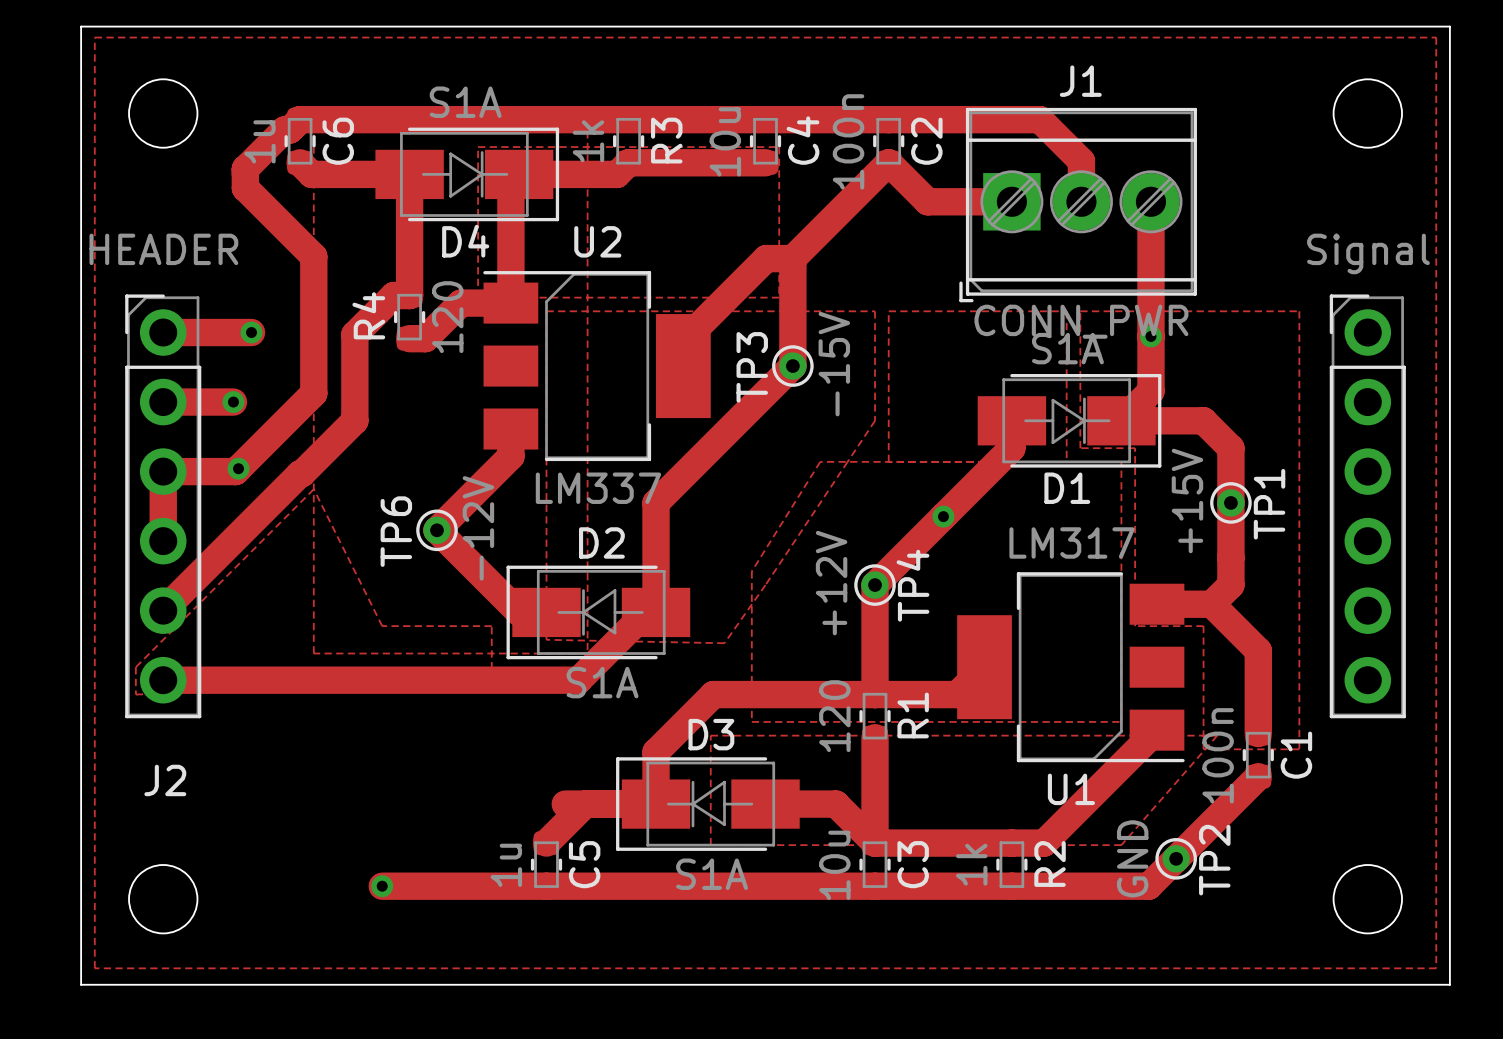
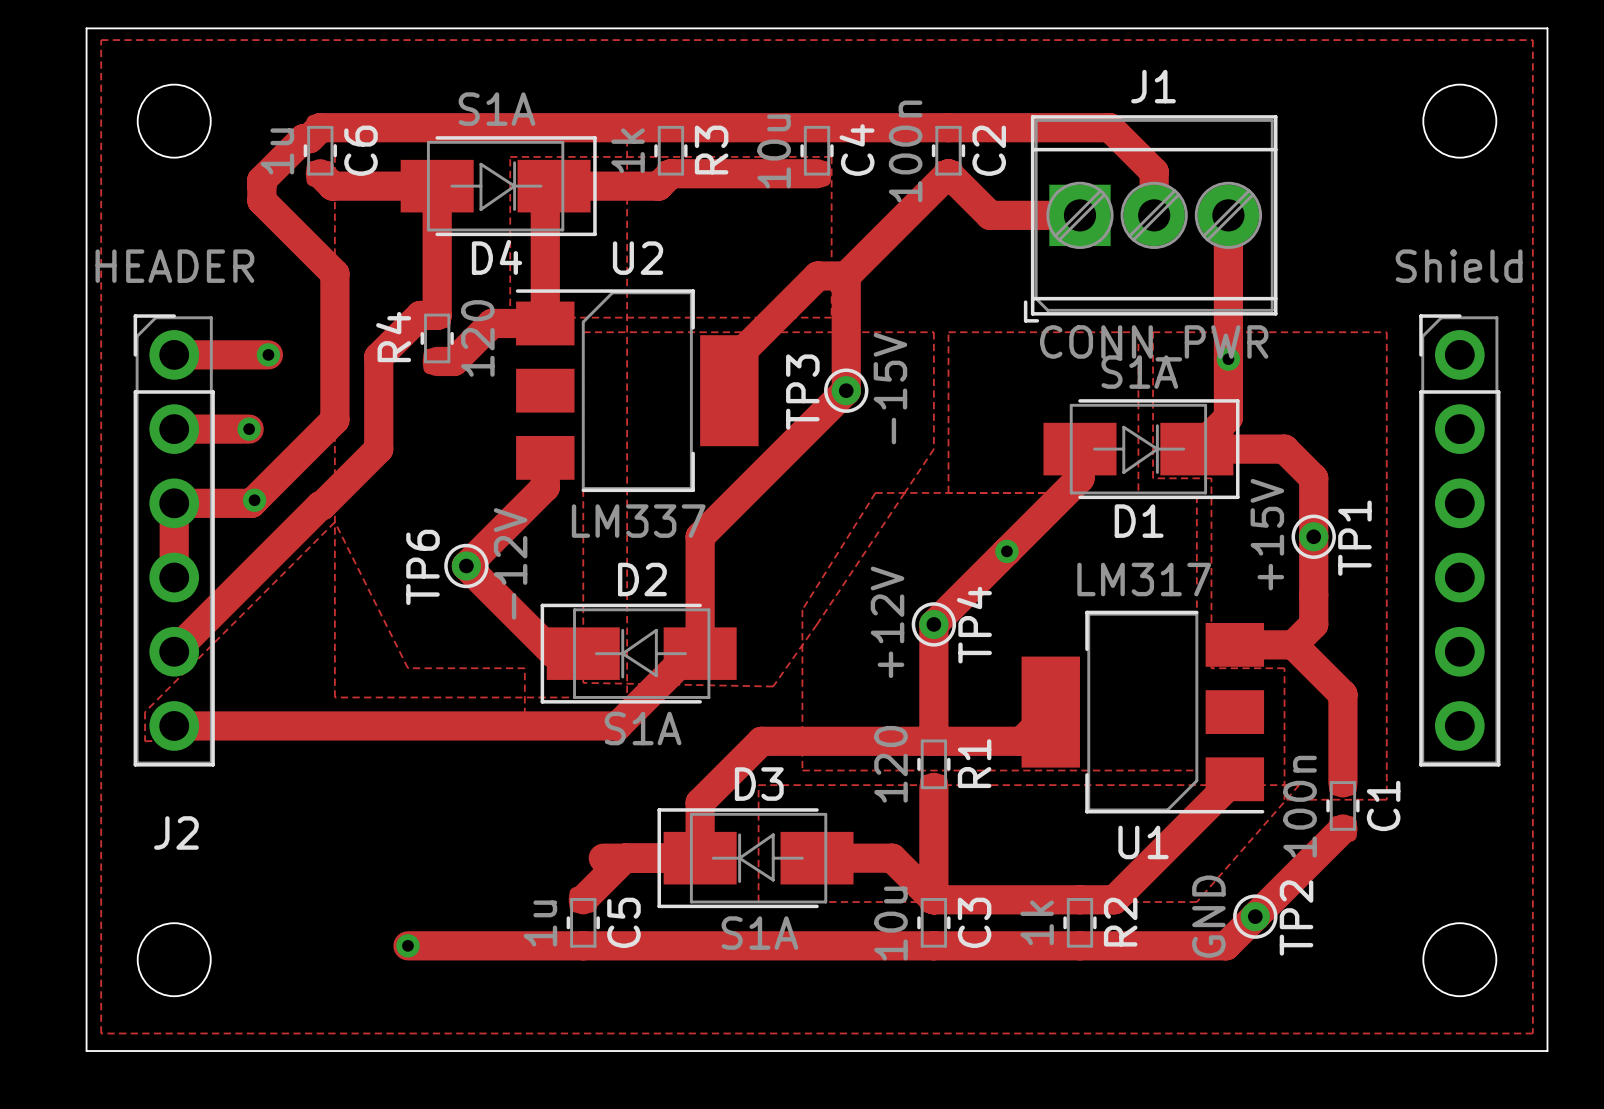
J2 text: Signal (1368, 253) -> Shield (1459, 266)

